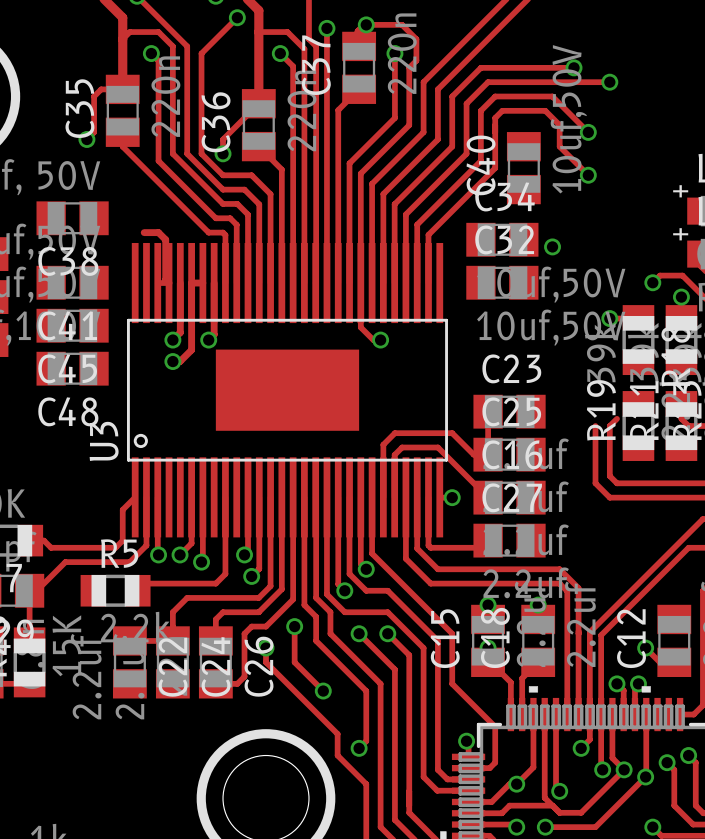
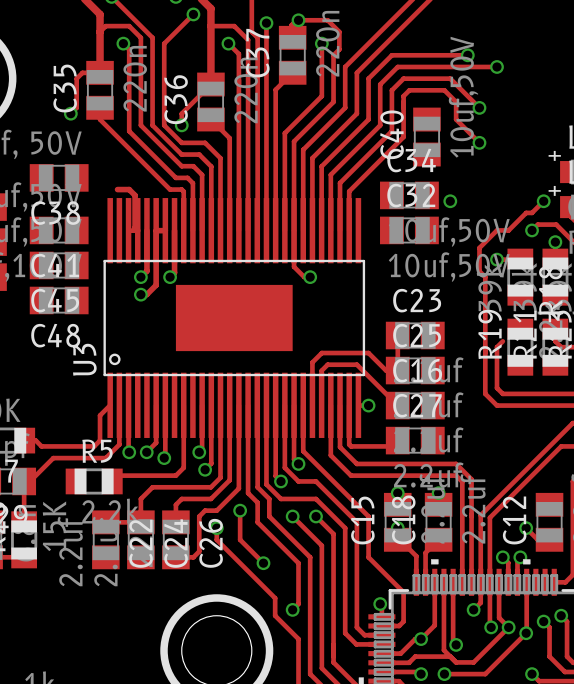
track: none -> (543, 201) (532, 212) (526, 212) (508, 230) (496, 230) (479, 247) (479, 271) (485, 277) (485, 347)
via: none -> (543, 201)

